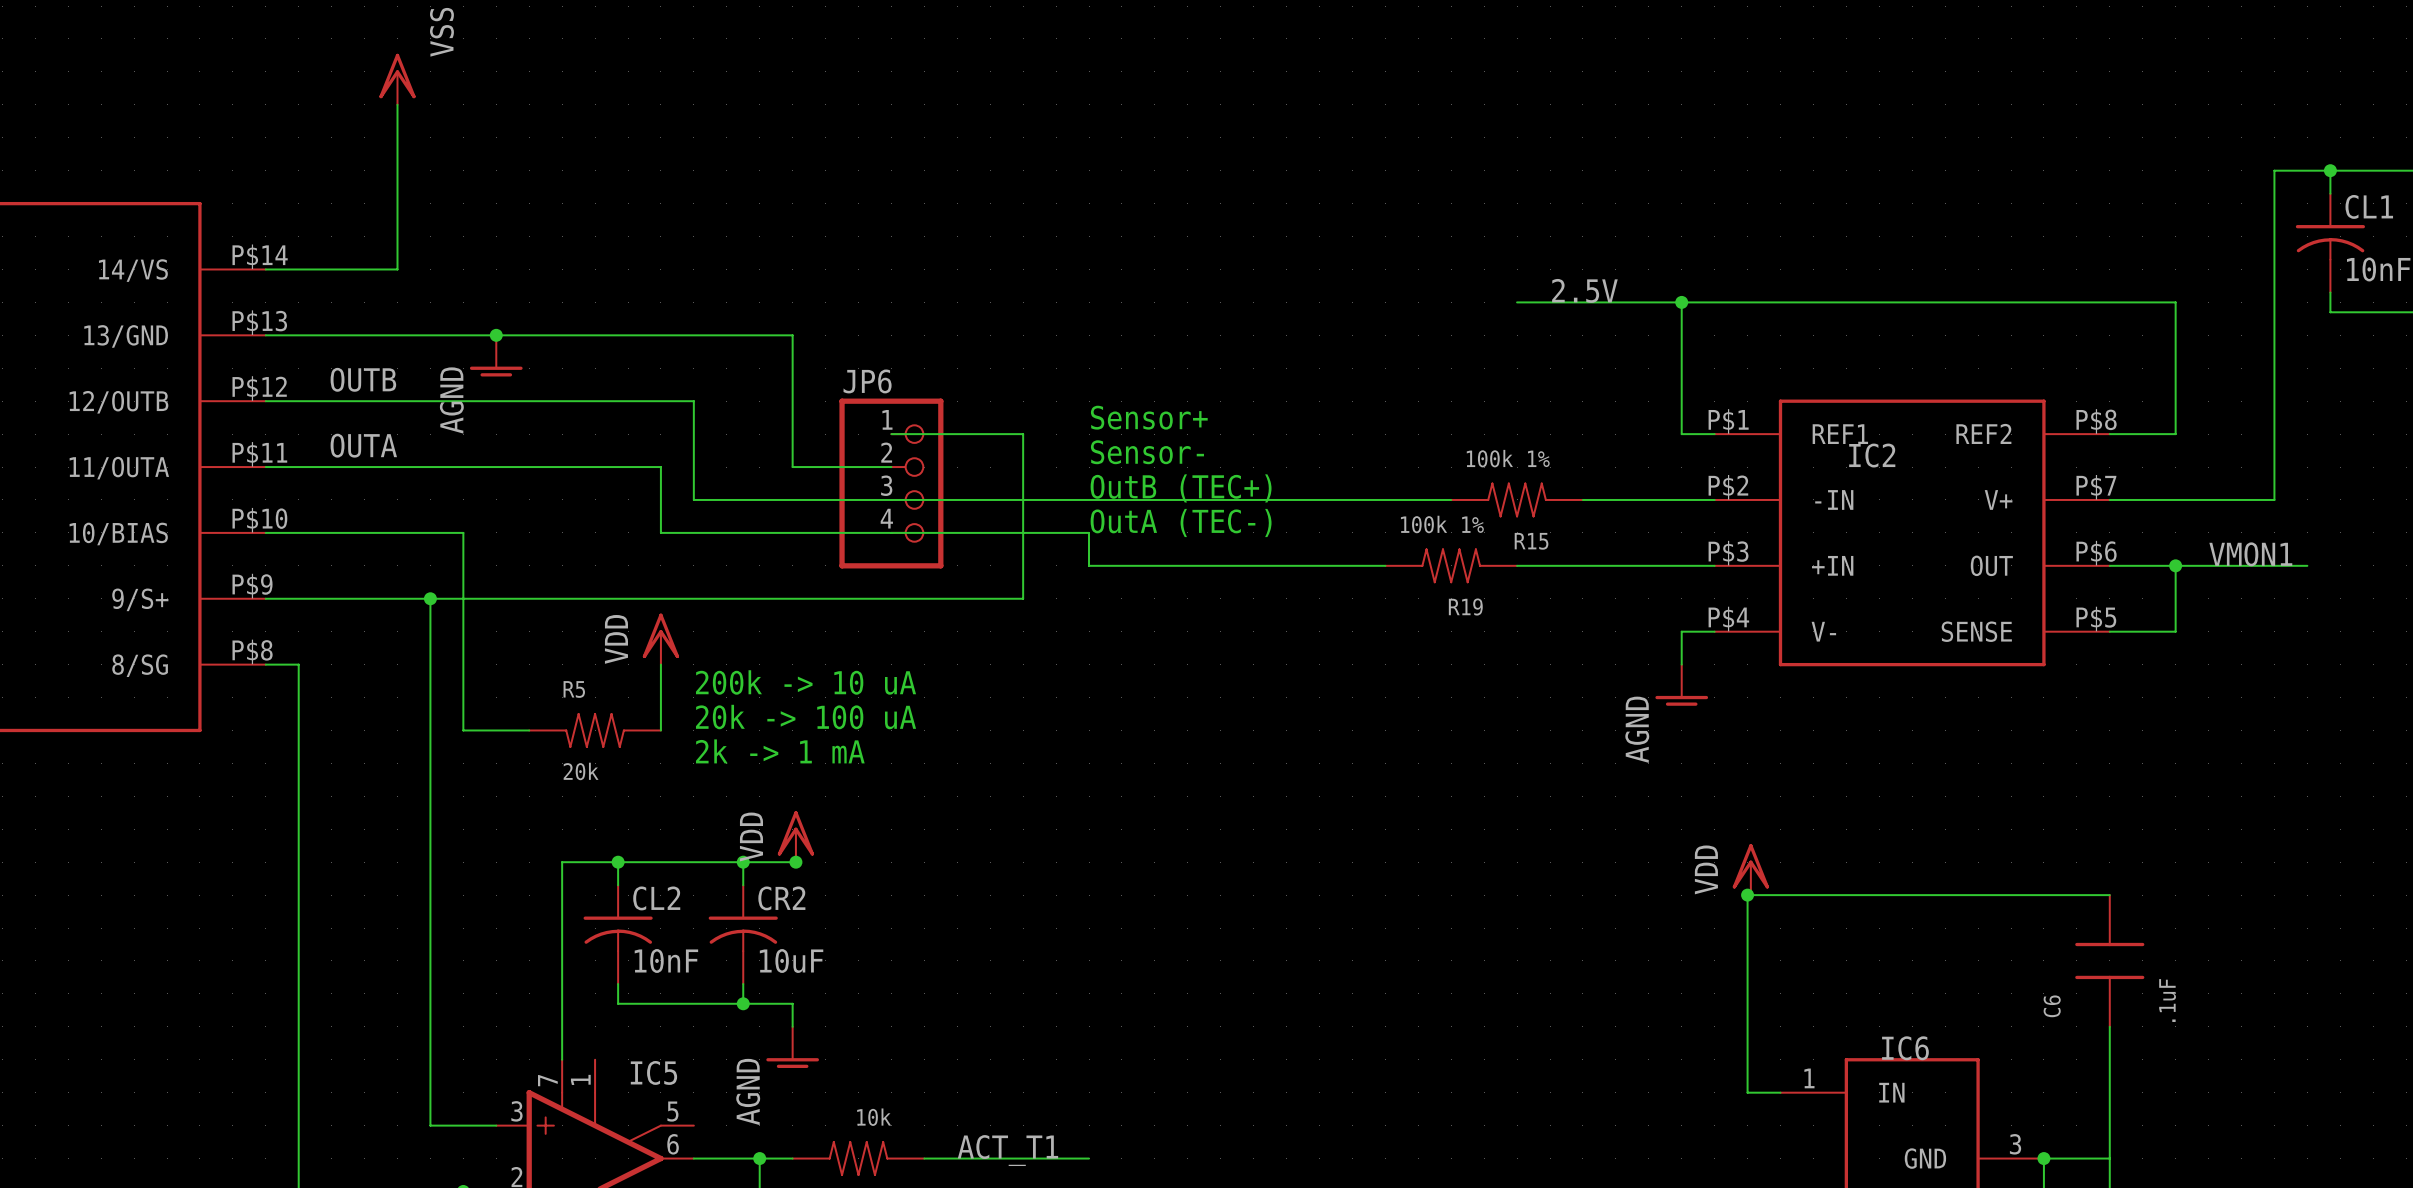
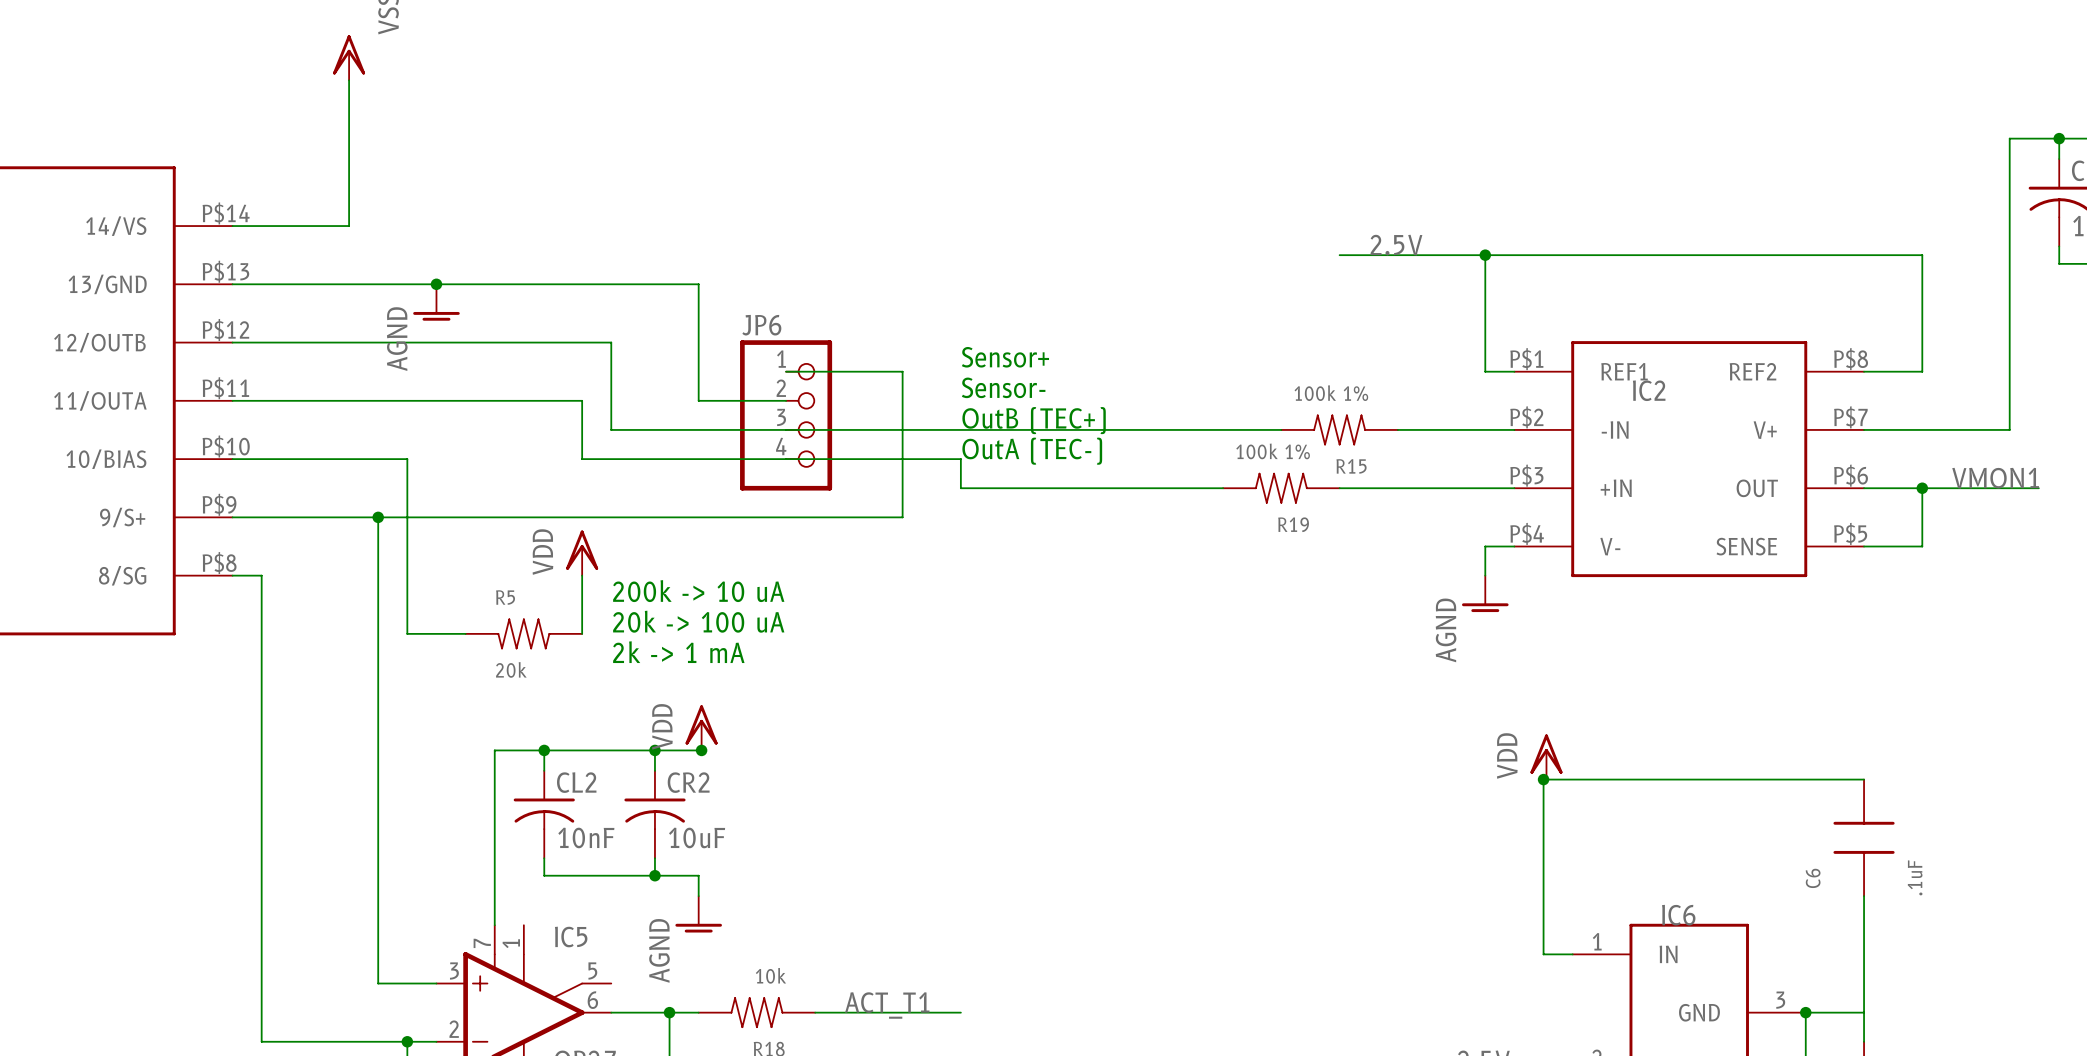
label: OUTB (363, 379) -> none
label: OUTA (363, 445) -> none

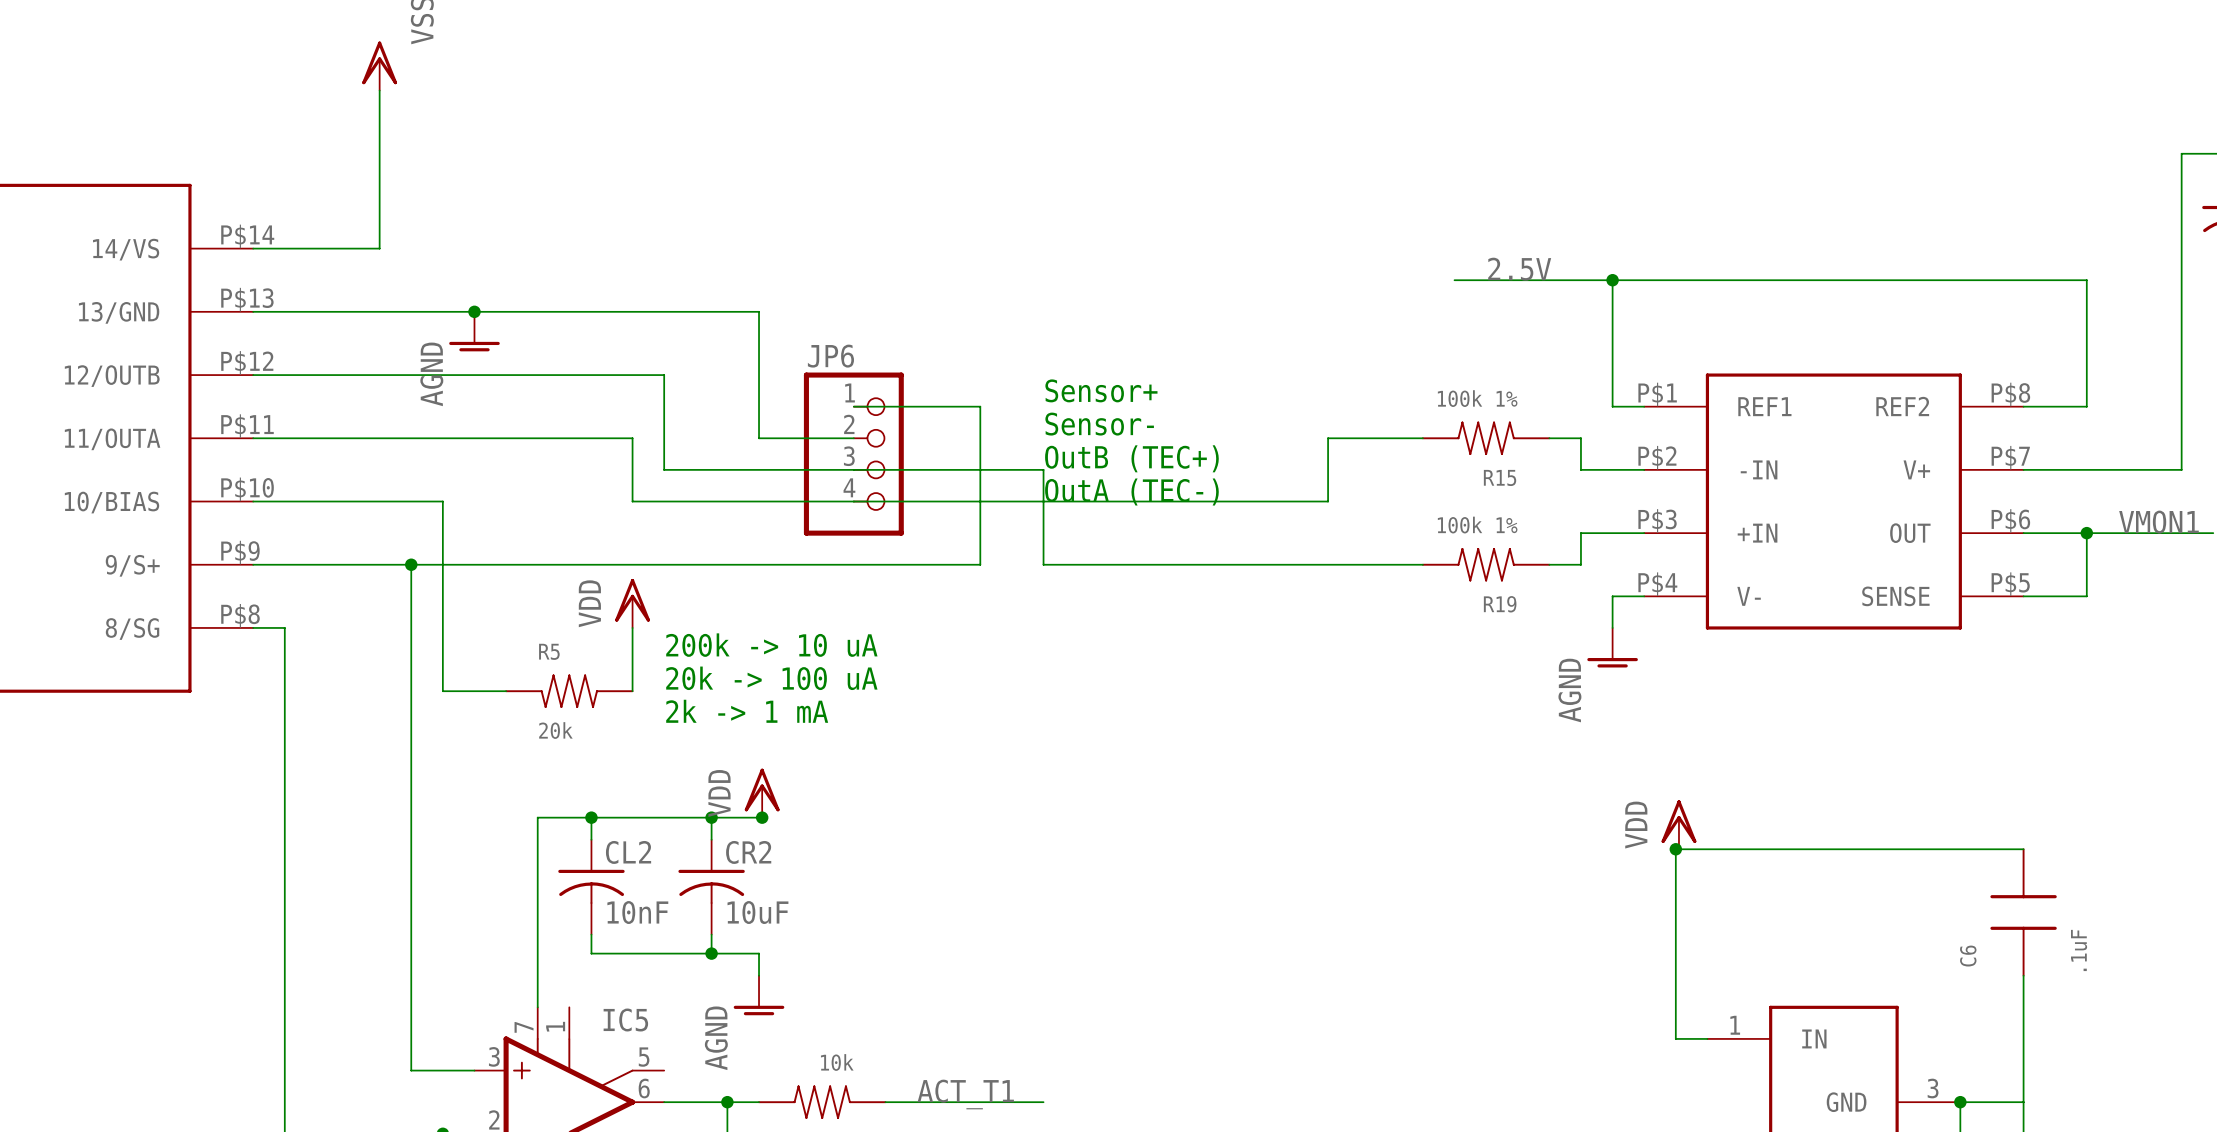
IC2 name: IC2 (1649, 390) -> none
wire: (960, 429) (1281, 429) -> (1043, 469) (1043, 501) (1328, 501) (1328, 438) (1422, 438)
R15 position: (1339, 429) -> (1486, 438)
wire: (1397, 429) (1456, 429) -> (1549, 438) (1580, 438) (1580, 469)
wire: (960, 488) (1223, 488) -> (1043, 533) (1043, 564) (1422, 564)
R19 position: (1281, 488) -> (1486, 564)
wire: (1339, 488) (1456, 488) -> (1549, 564) (1580, 564) (1580, 533)
IC6 name: IC6 (1678, 915) -> none

